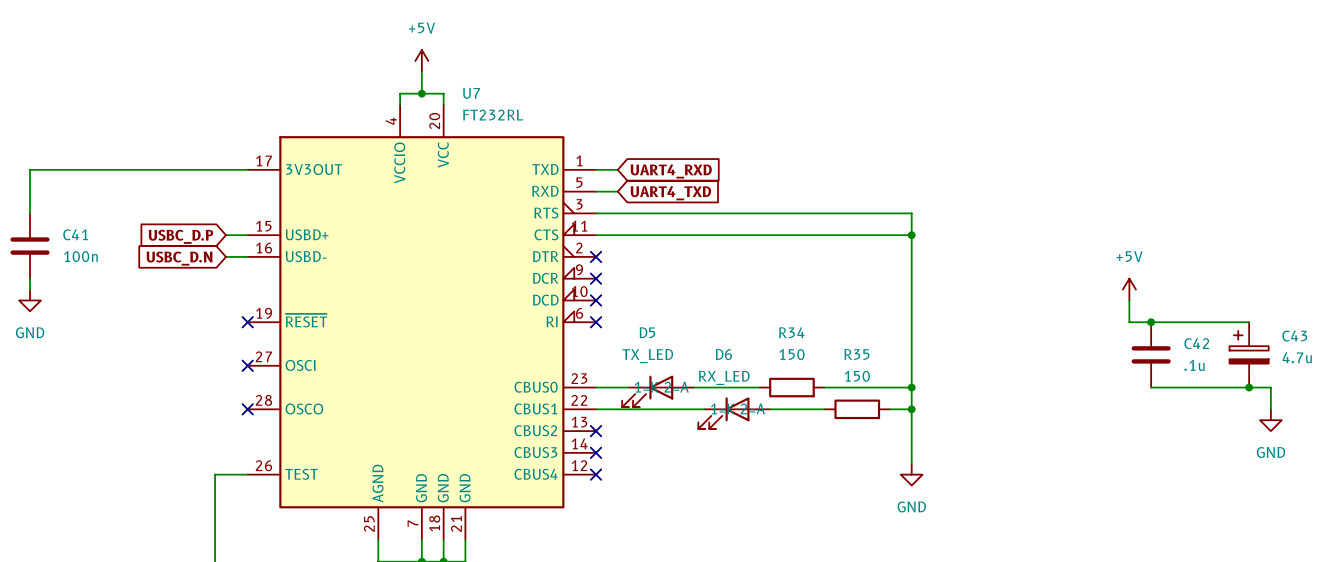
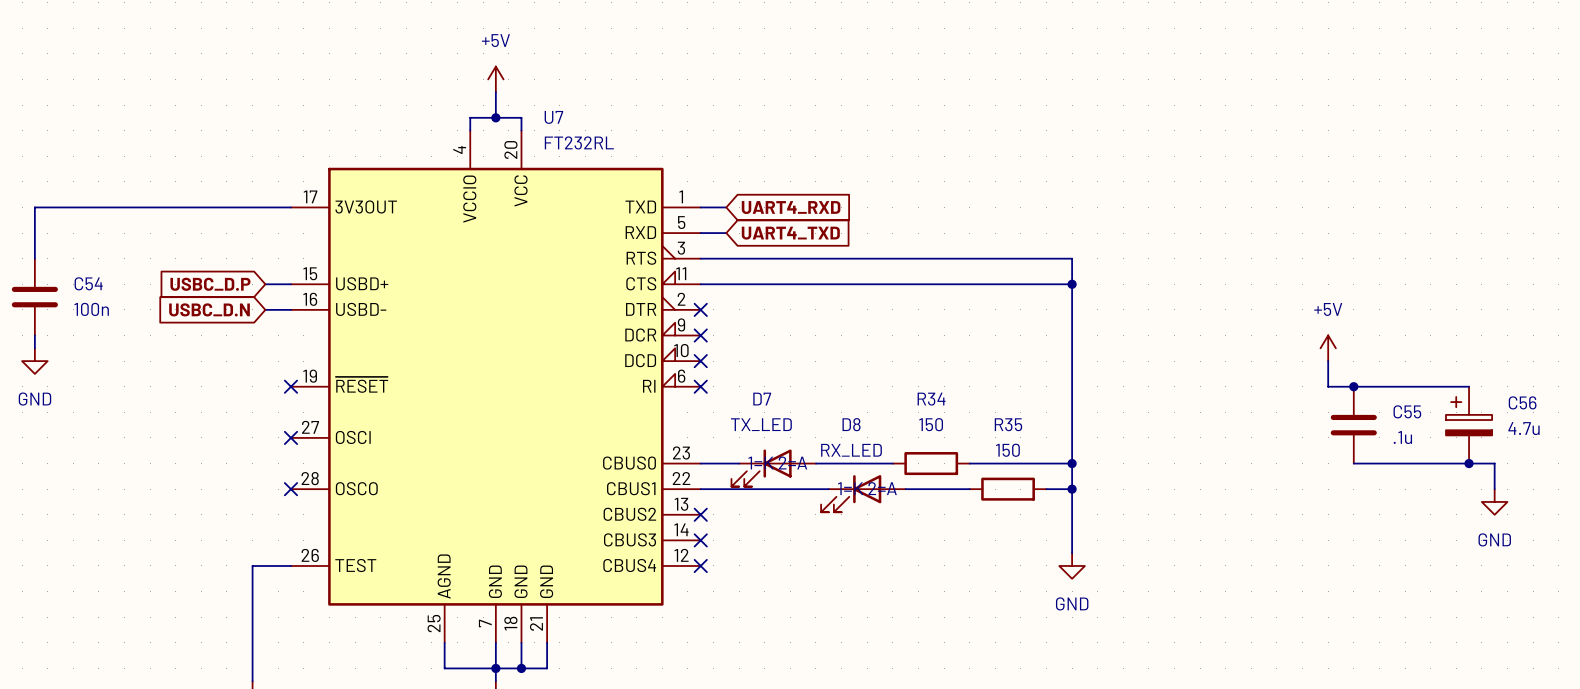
C41 name: C41 (75, 234) -> C54 (88, 283)
D5 name: D5 (647, 332) -> D7 (762, 399)
C43 name: C43 (1294, 336) -> C56 (1522, 402)
C42 name: C42 (1196, 343) -> C55 (1407, 411)
D6 name: D6 (723, 354) -> D8 (851, 424)

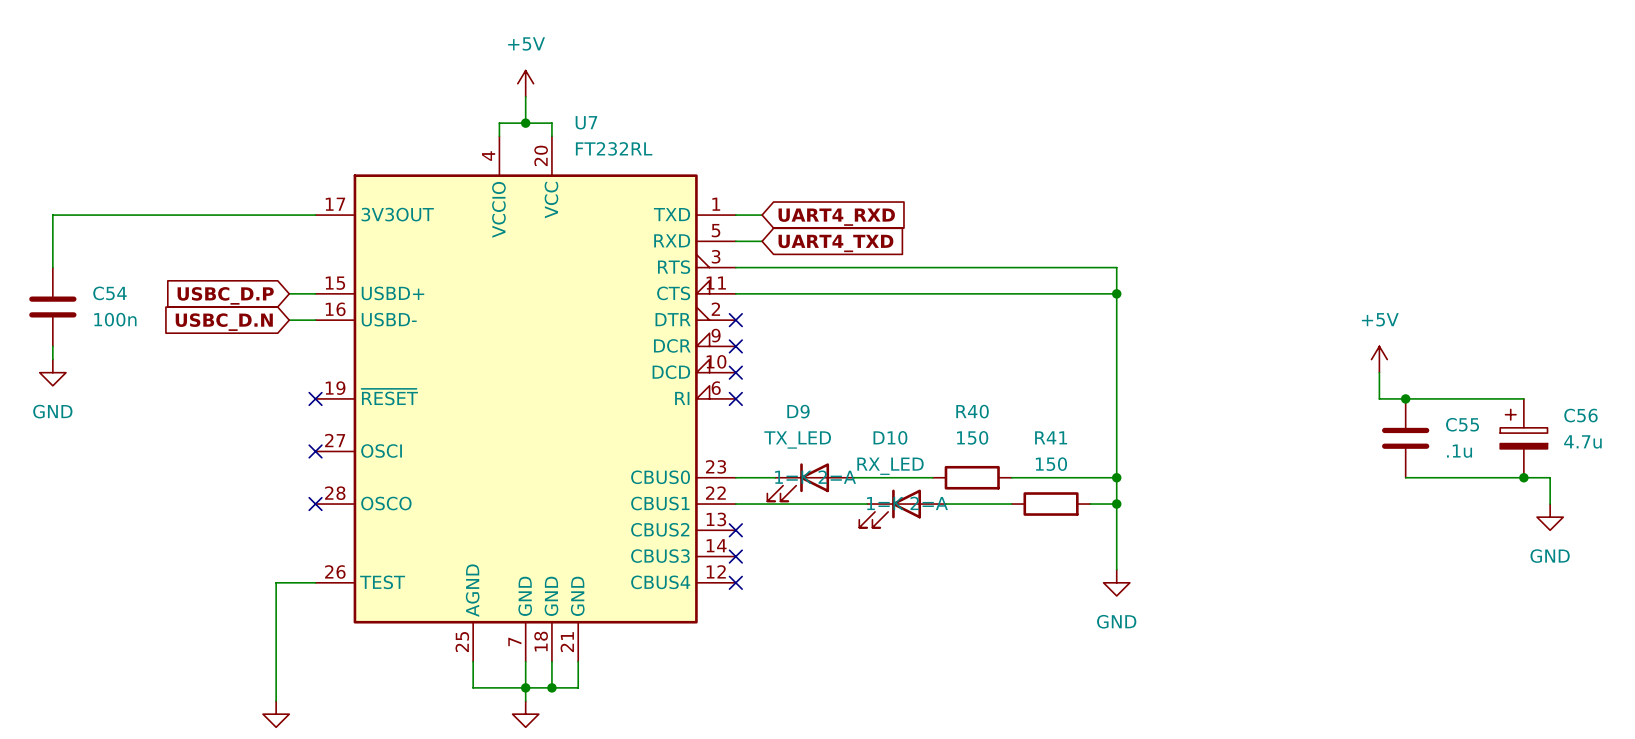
D7 name: D7 (762, 399) -> D9 (798, 411)
R34 name: R34 (931, 399) -> R40 (972, 411)
D8 name: D8 (851, 424) -> D10 (890, 437)
R35 name: R35 (1008, 424) -> R41 (1051, 437)

